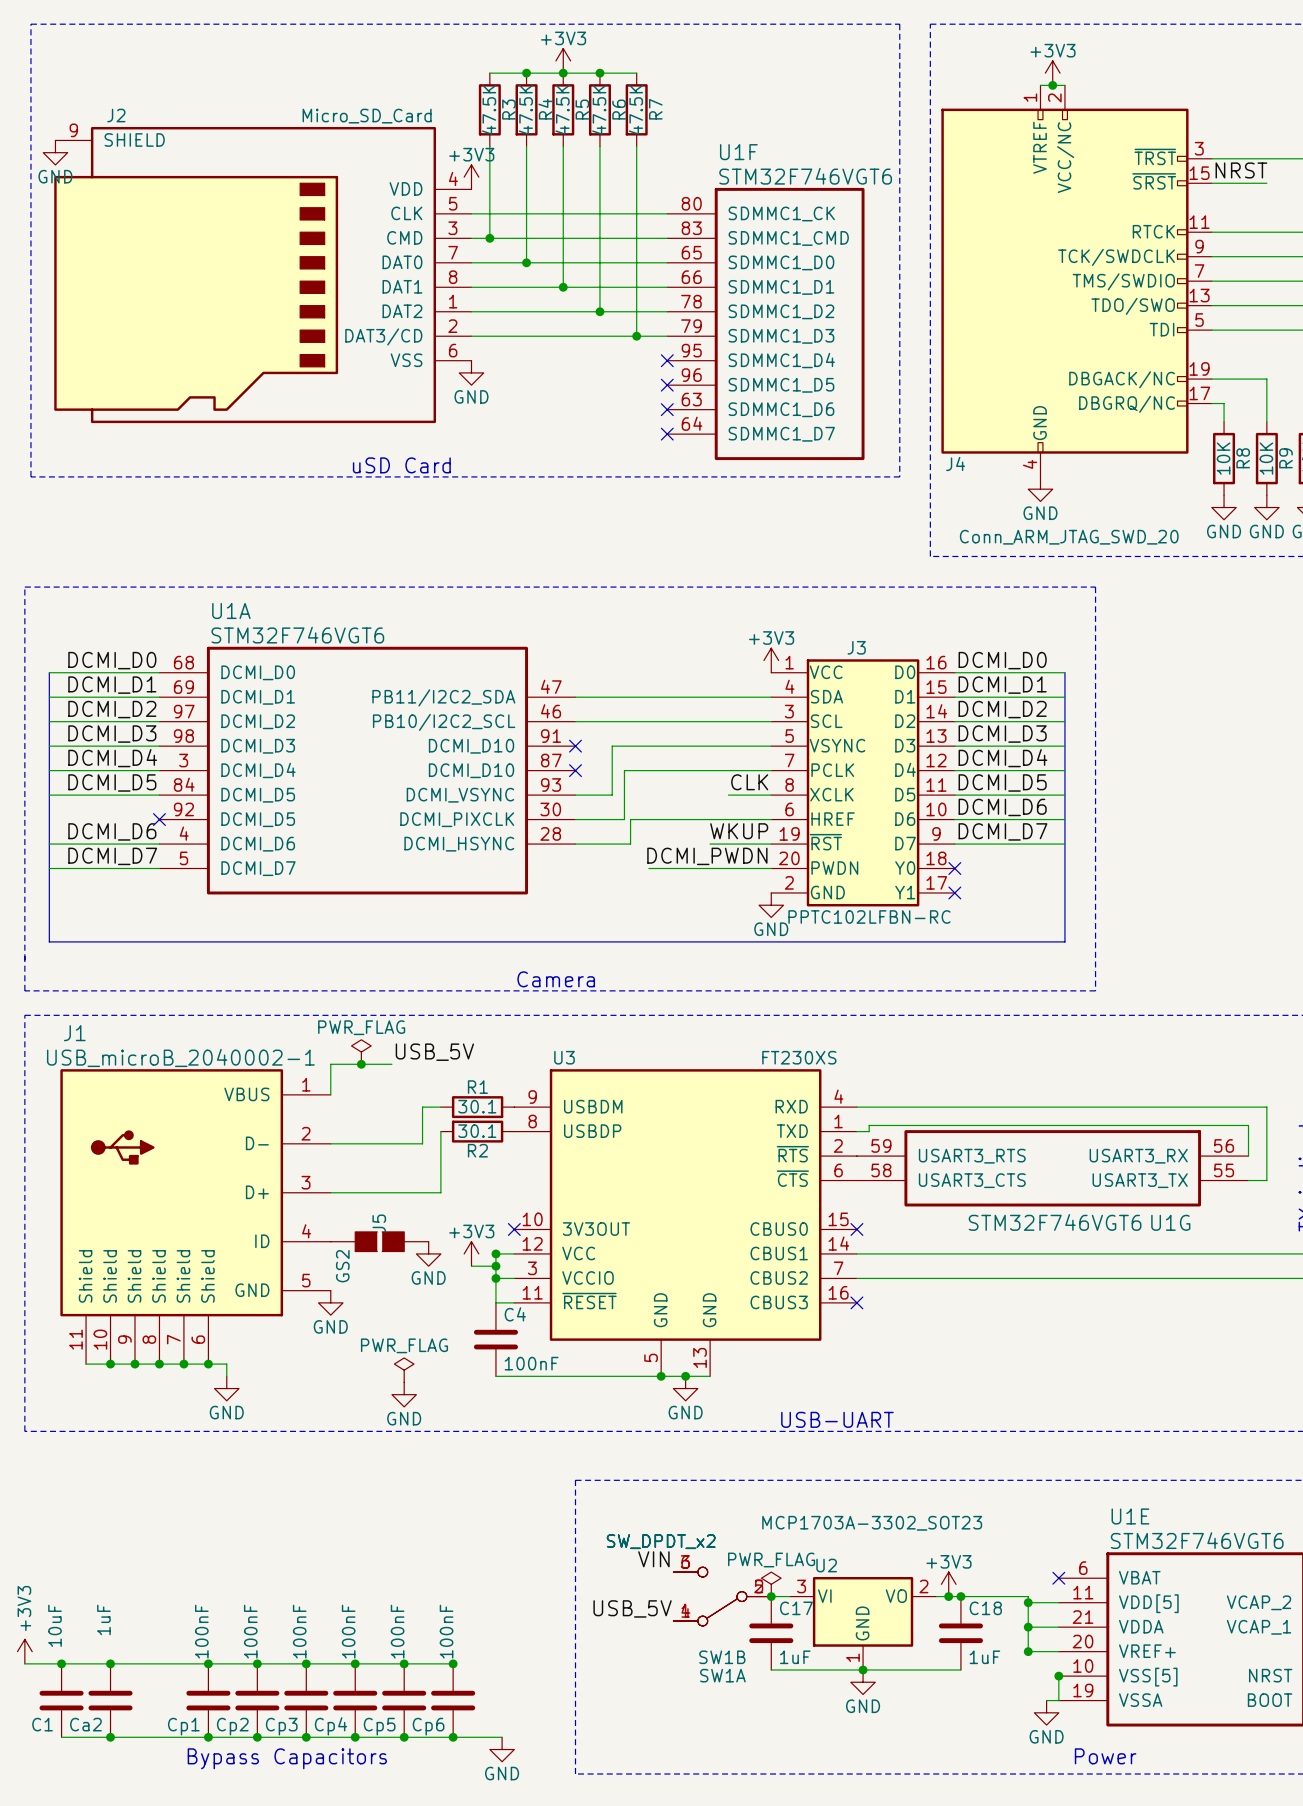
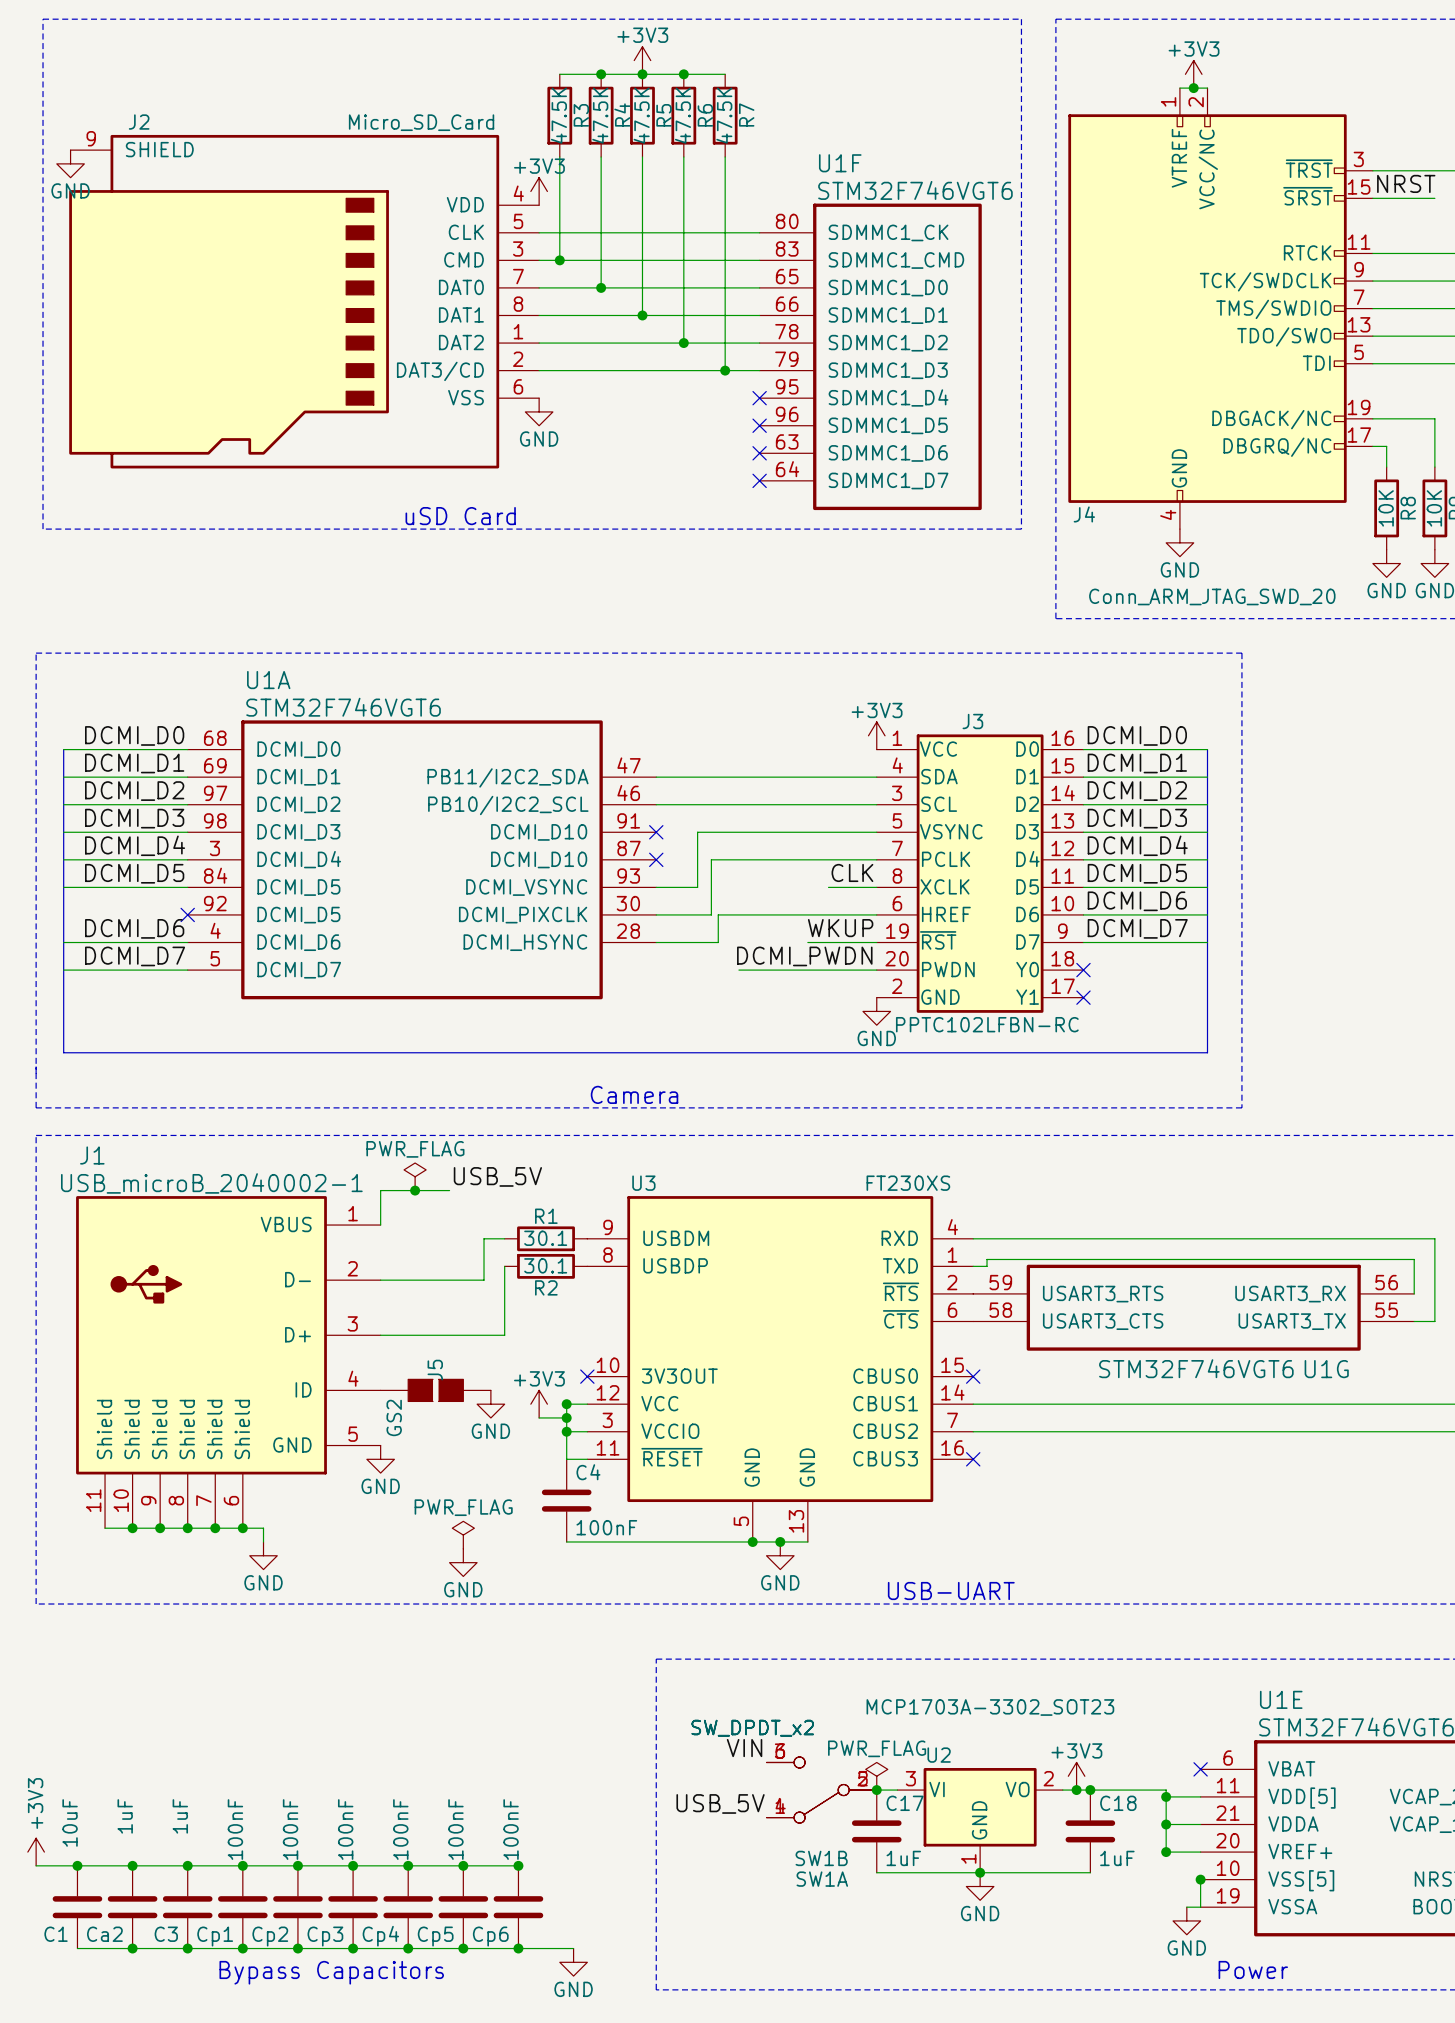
junction: none -> (187, 1865)
C3: none -> 1uF (187, 1907)
junction: none -> (187, 1948)

